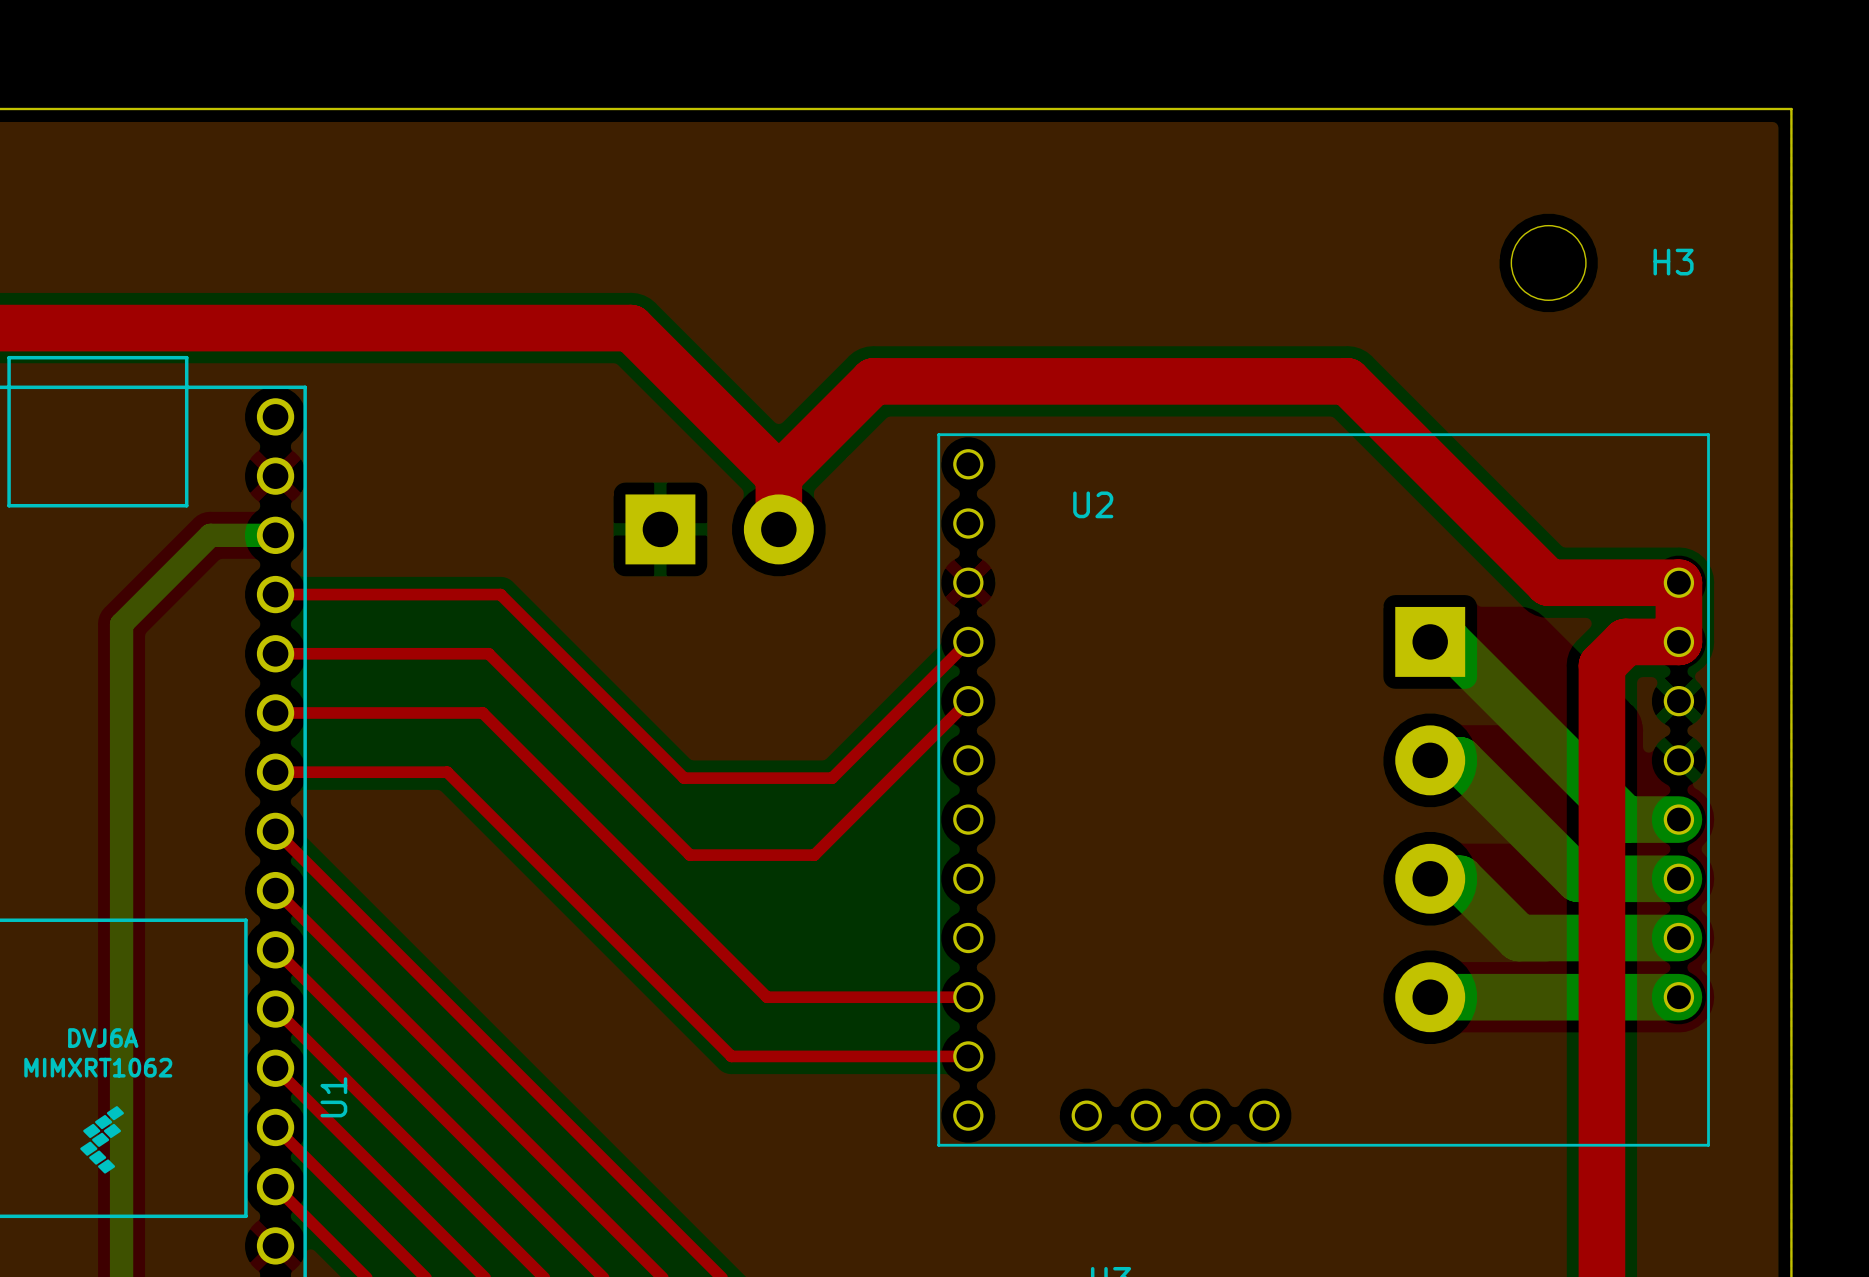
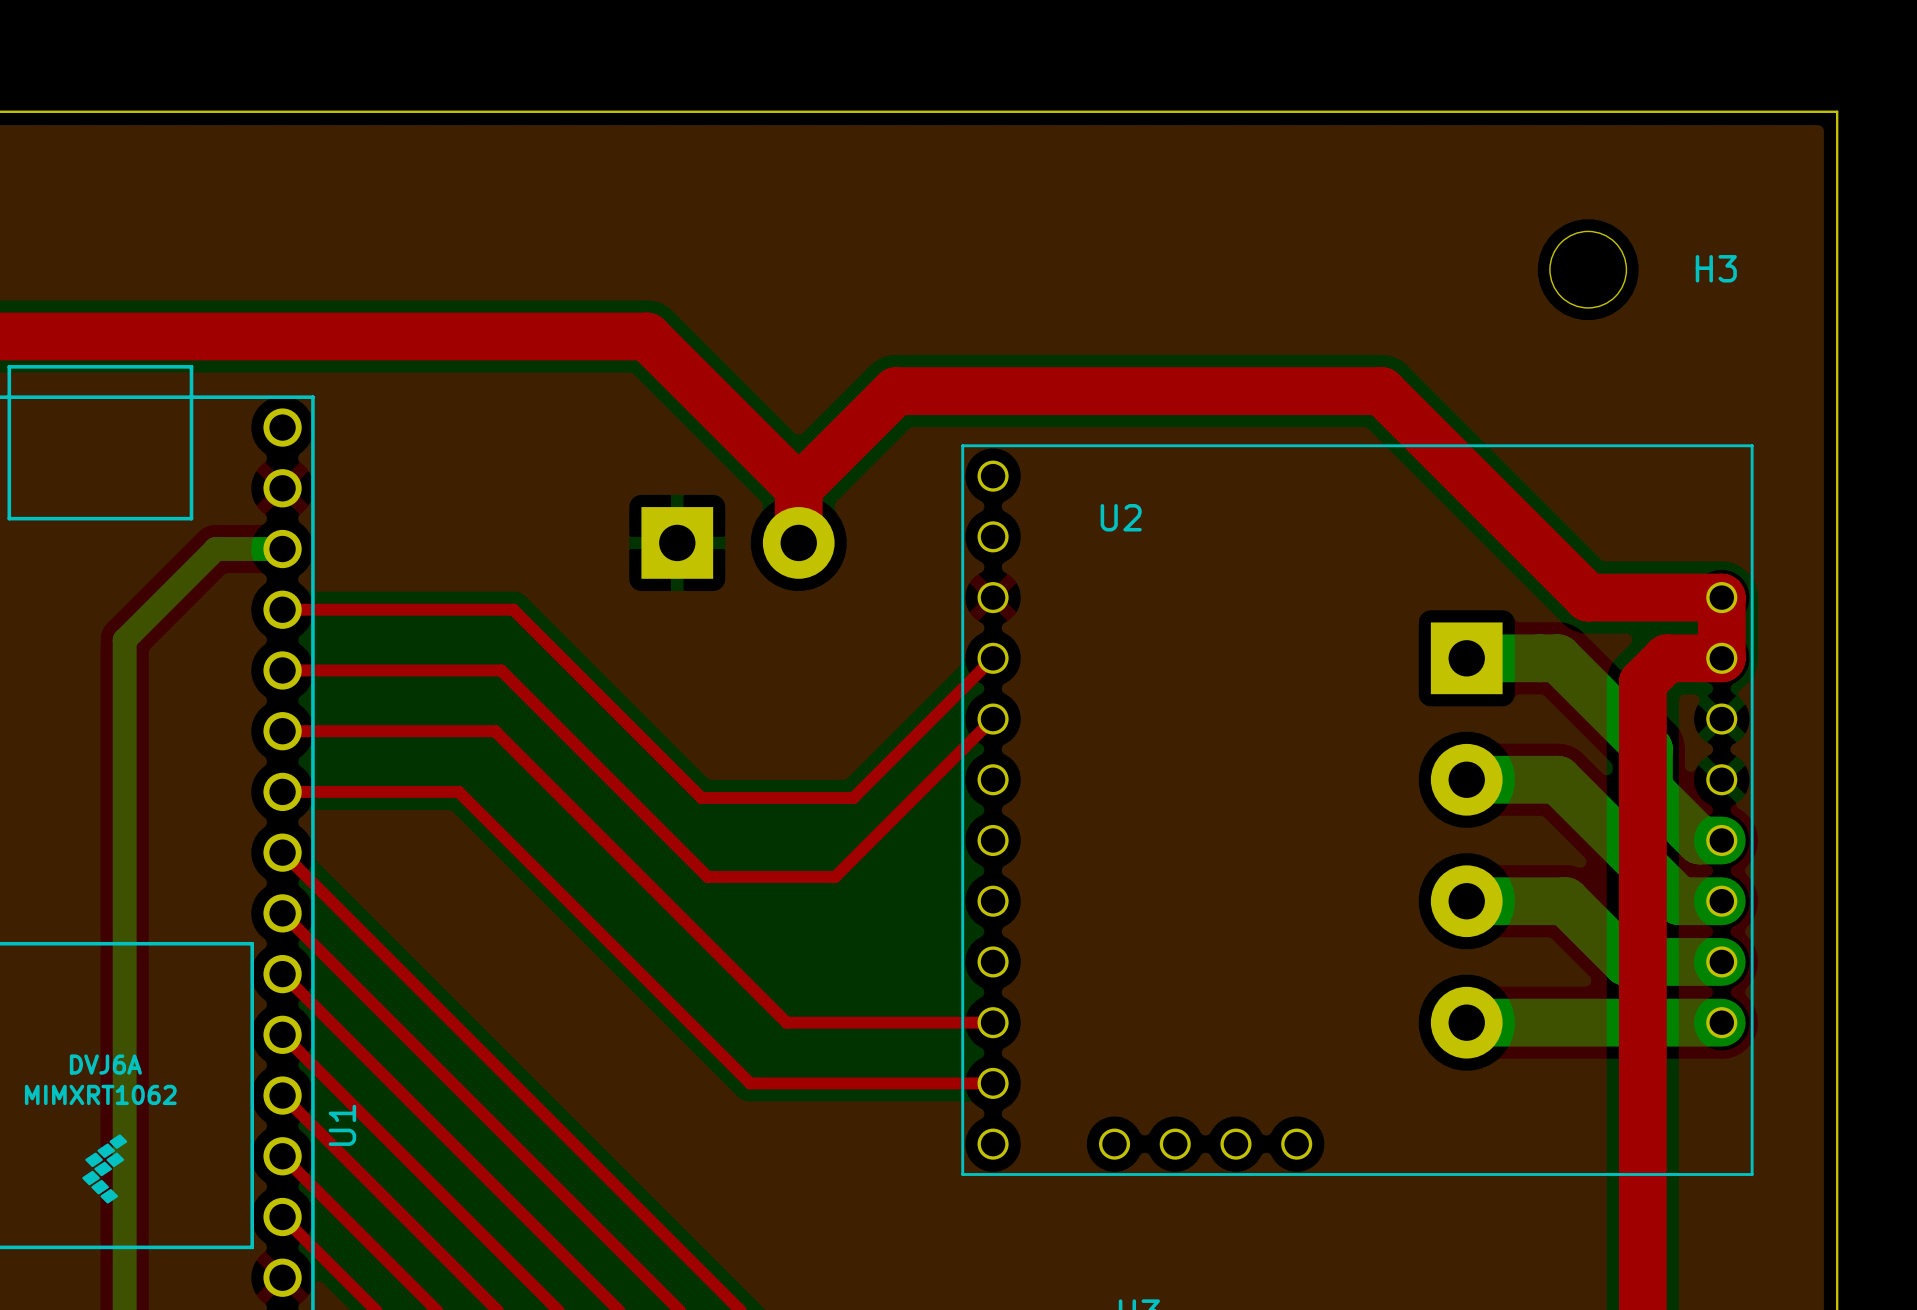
bottom track: (1447, 641) (1625, 819) (1657, 819) -> (1484, 658) (1557, 658) (1648, 749) (1648, 789) (1699, 840)
bottom track: (1459, 760) (1578, 878) (1637, 878) -> (1497, 779) (1557, 779) (1679, 901)
bottom track: (1459, 878) (1519, 938) (1585, 938) -> (1497, 901) (1565, 901) (1626, 961)

